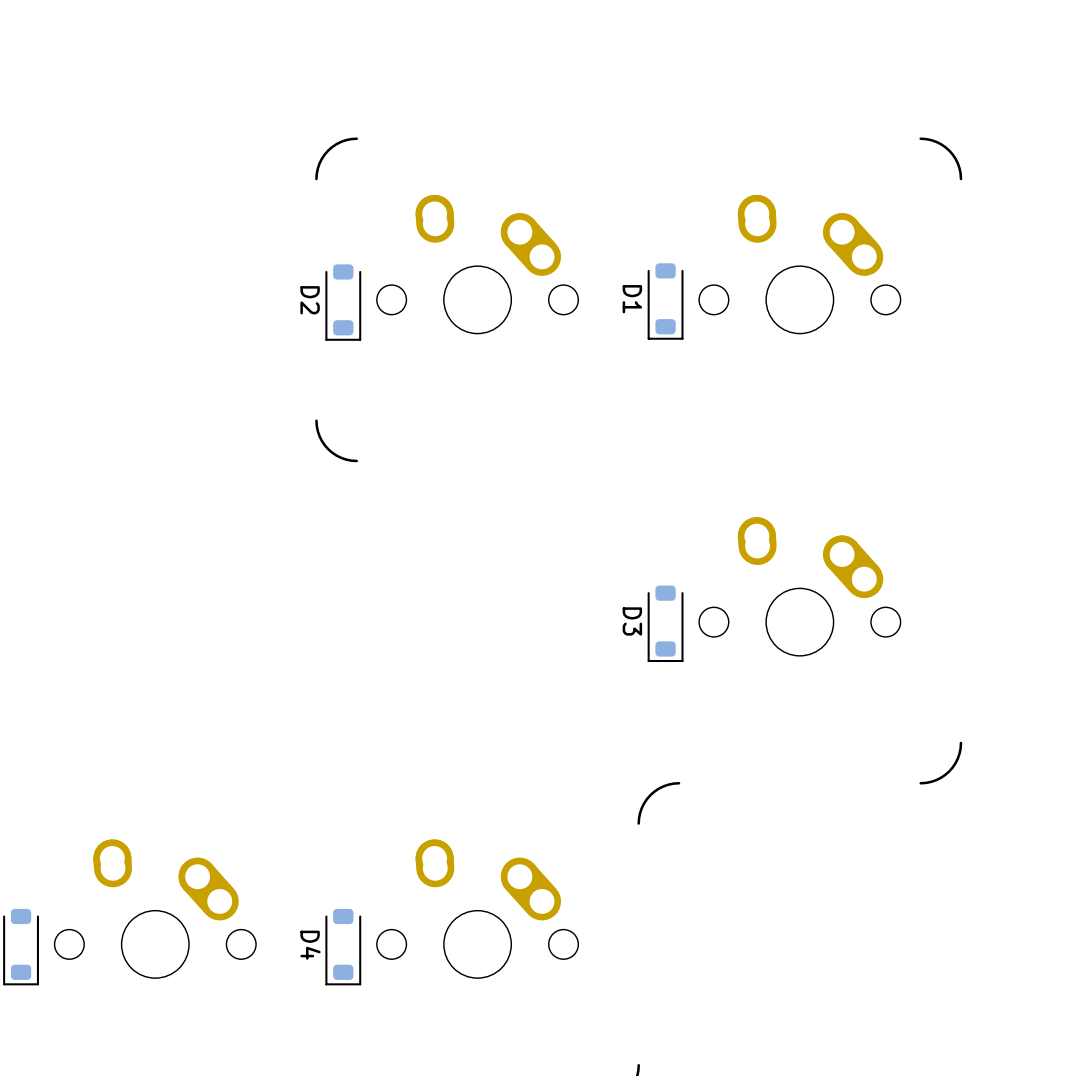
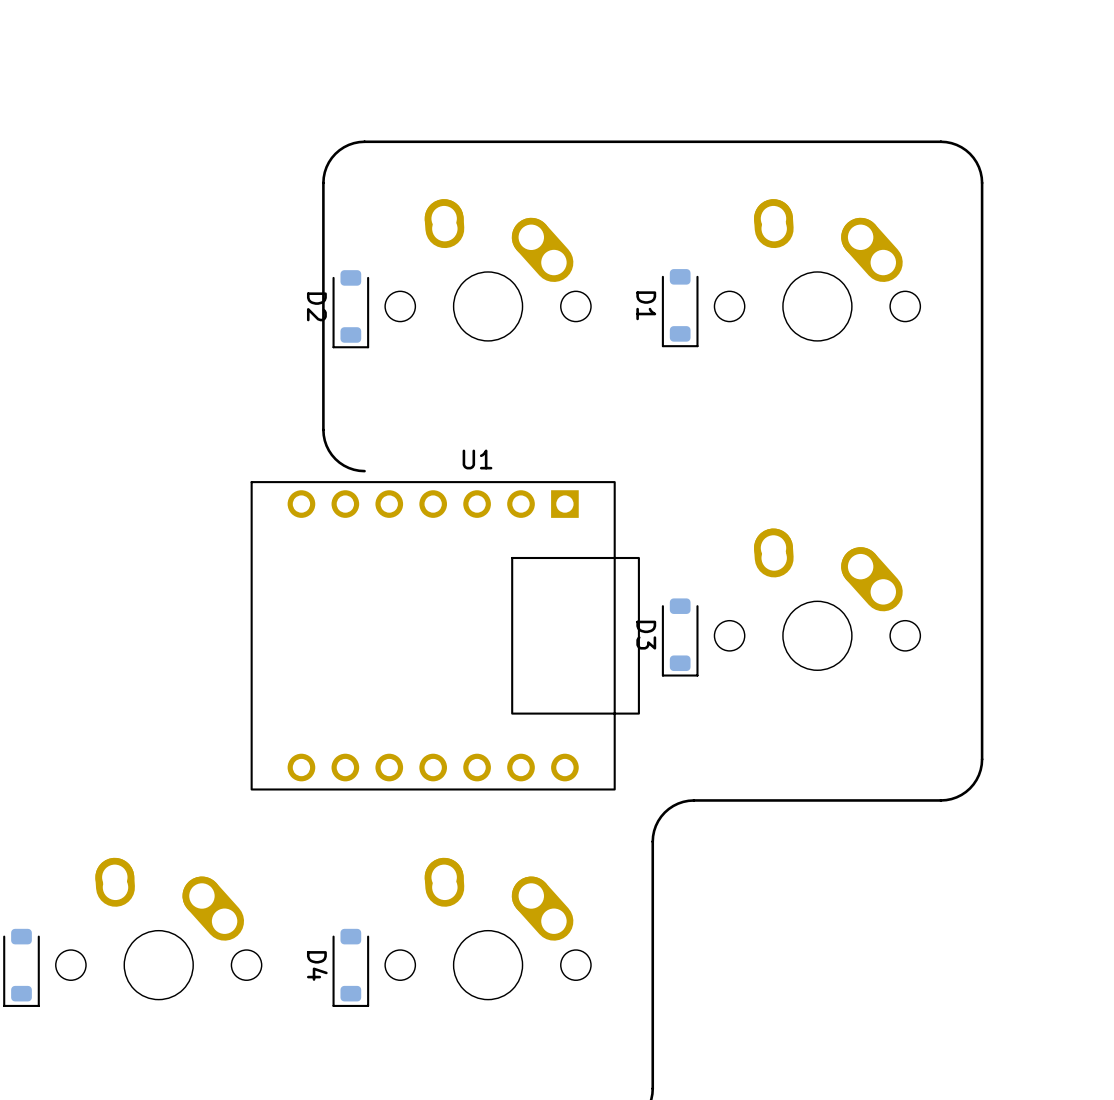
board edge: none -> (940, 141) (364, 141)
board edge: none -> (323, 182) (323, 429)
board edge: none -> (982, 182) (982, 759)
U1: none -> (445, 635)
board edge: none -> (940, 800) (693, 800)
board edge: none -> (652, 841) (652, 1088)

